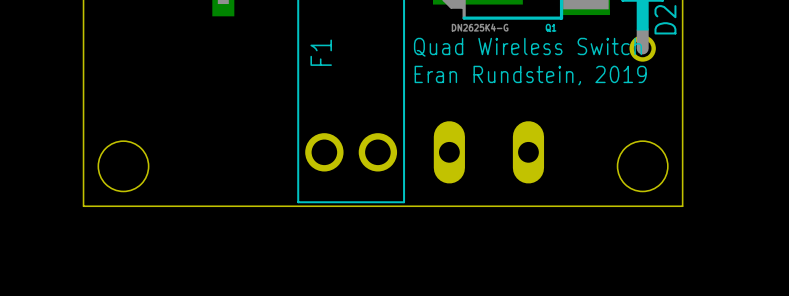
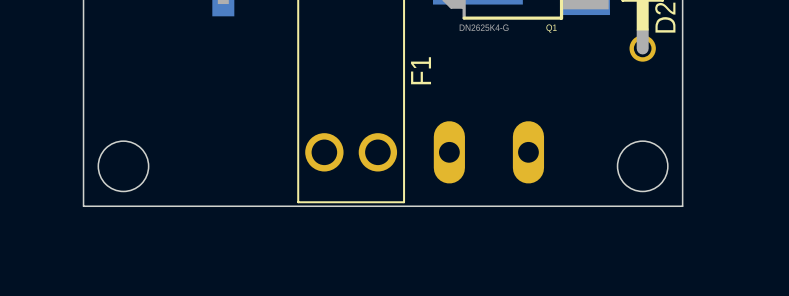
text: Quad Wireless Switch (527, 47) -> none
F1 name position: F1 (321, 52) -> F1 (421, 70)
text: Eran Rundstein, 2019 (530, 75) -> none

